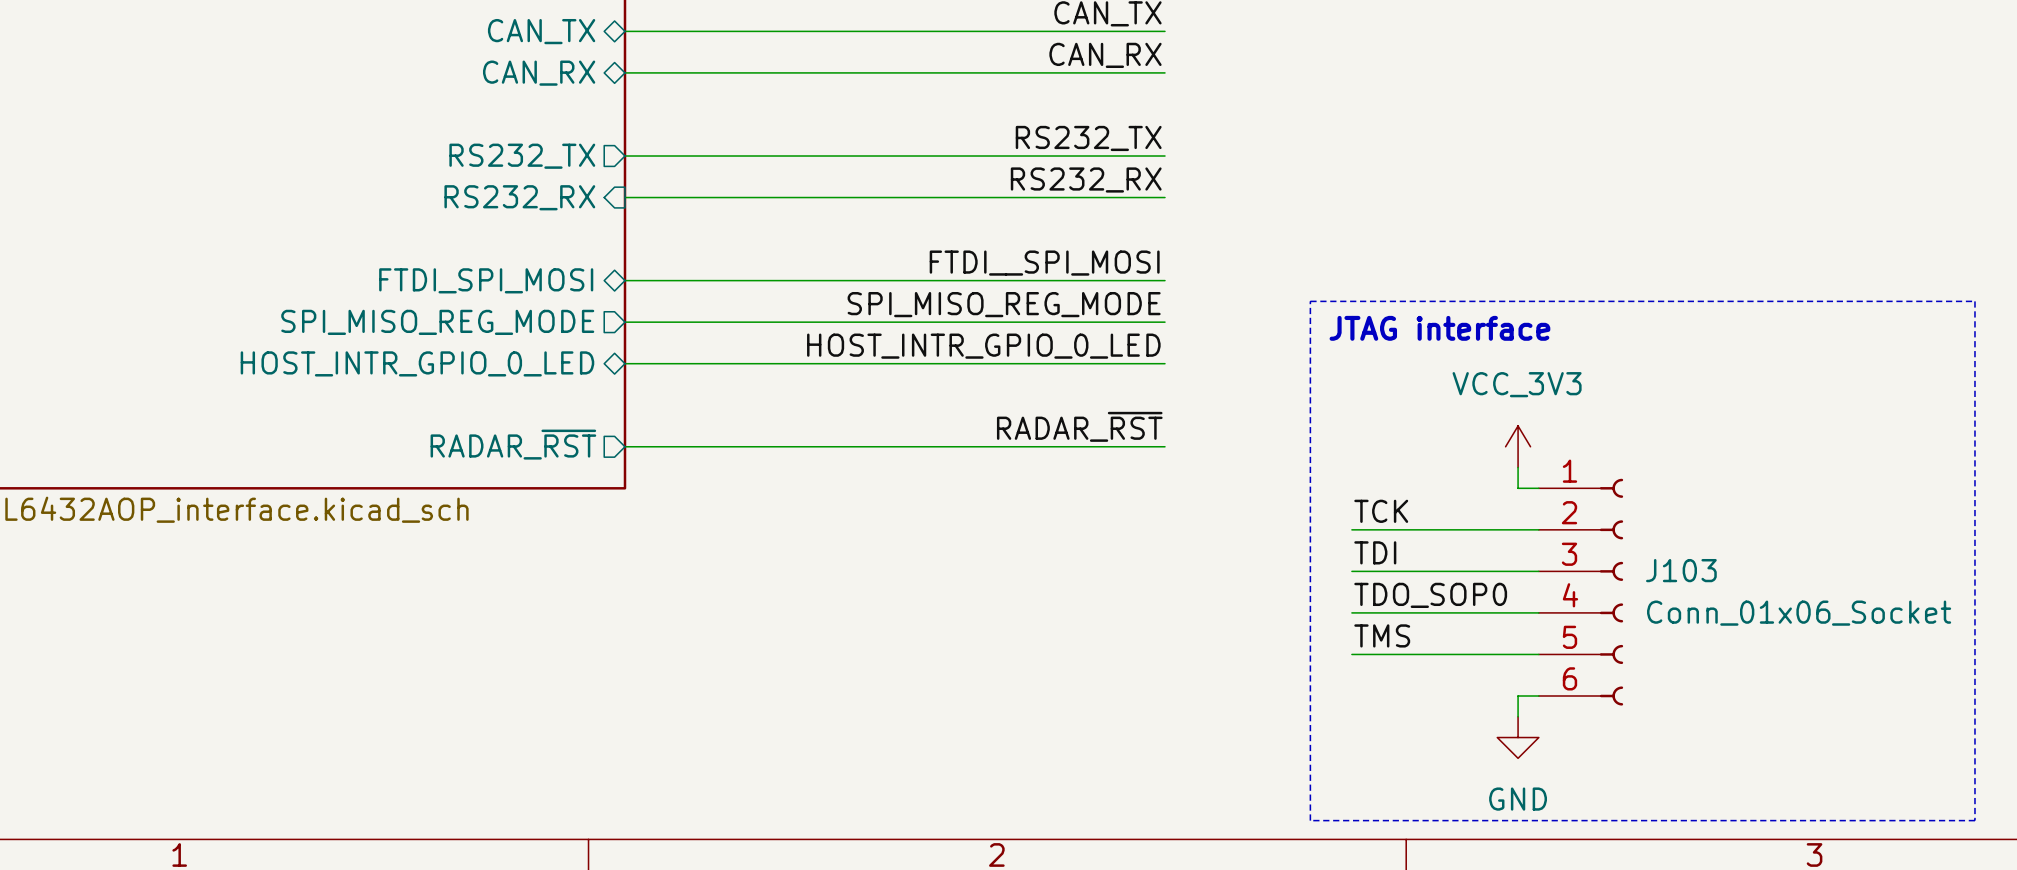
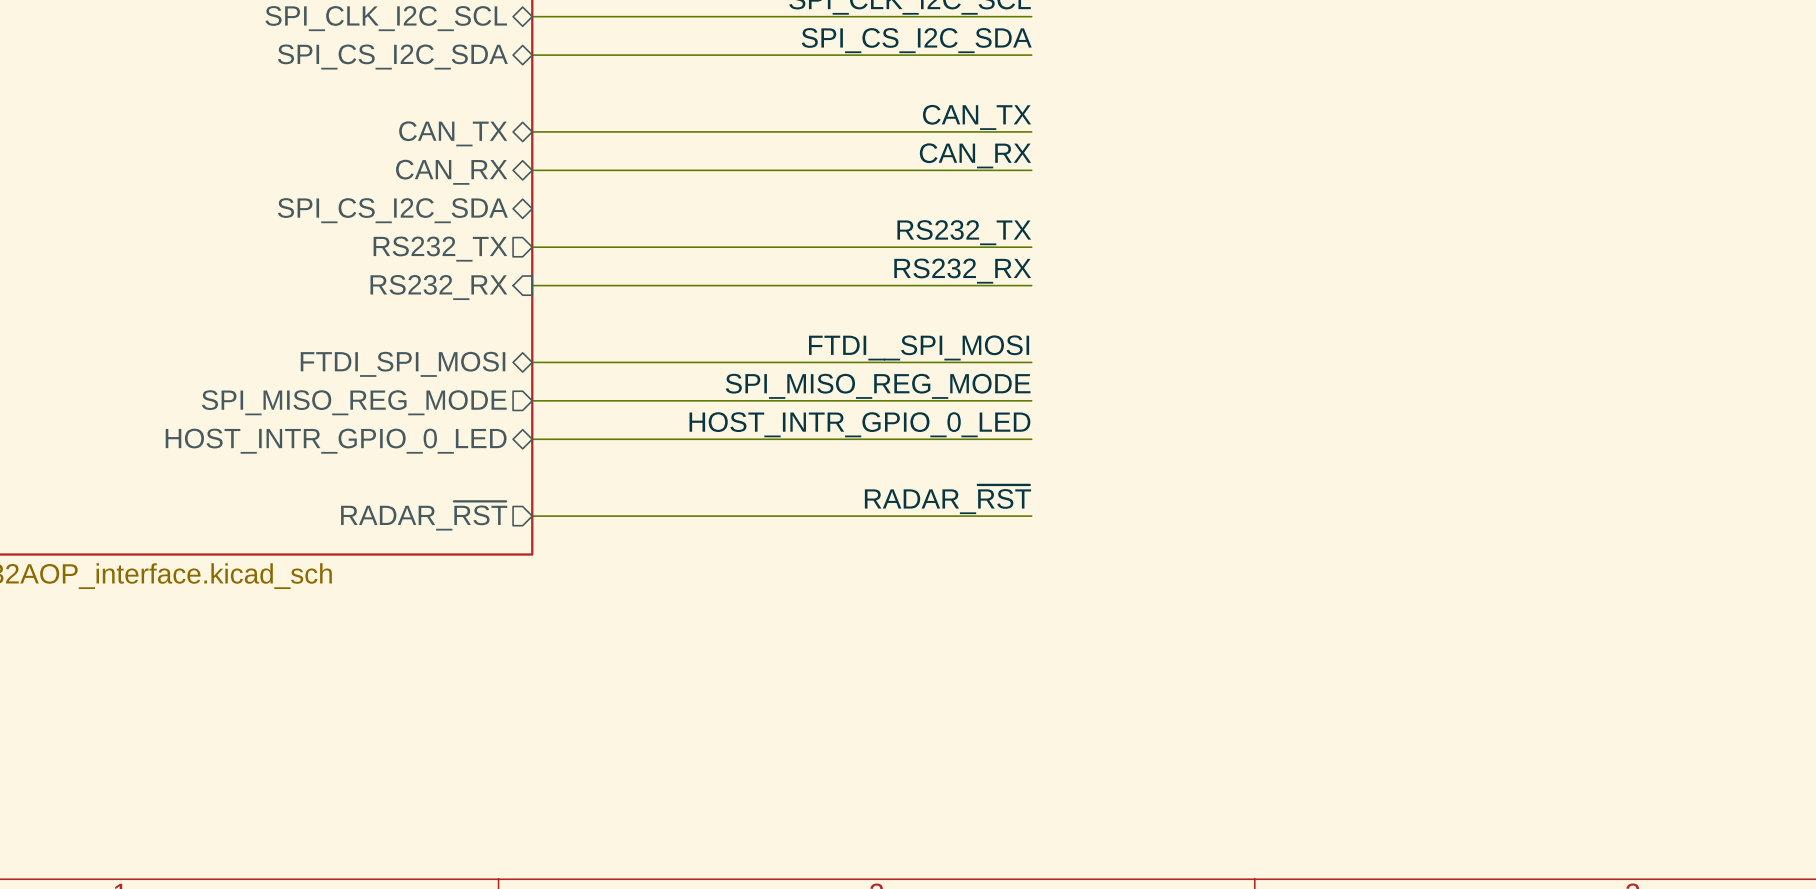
sheet pin: none -> SPI_CS_I2C_SDA (392, 210)
line: (1310, 301) (1974, 301) (1974, 820) (1310, 820) (1310, 301) -> none
text: JTAG interface (1439, 328) -> none
power symbol: VCC_3V3 (1518, 446) -> none
wire: (1518, 467) (1518, 488) (1538, 488) -> none
label: TCK (1381, 511) -> none
wire: (1351, 529) (1538, 529) -> none
label: TDI (1375, 552) -> none
wire: (1351, 571) (1538, 571) -> none
J103: Conn_01x06_Socket (1580, 592) -> none
label: TDO_SOP0 (1430, 595) -> none
wire: (1351, 612) (1538, 612) -> none
label: TMS (1382, 635) -> none
wire: (1351, 654) (1538, 654) -> none
wire: (1538, 696) (1518, 696) (1518, 716) -> none
power symbol: GND (1518, 737) -> none

